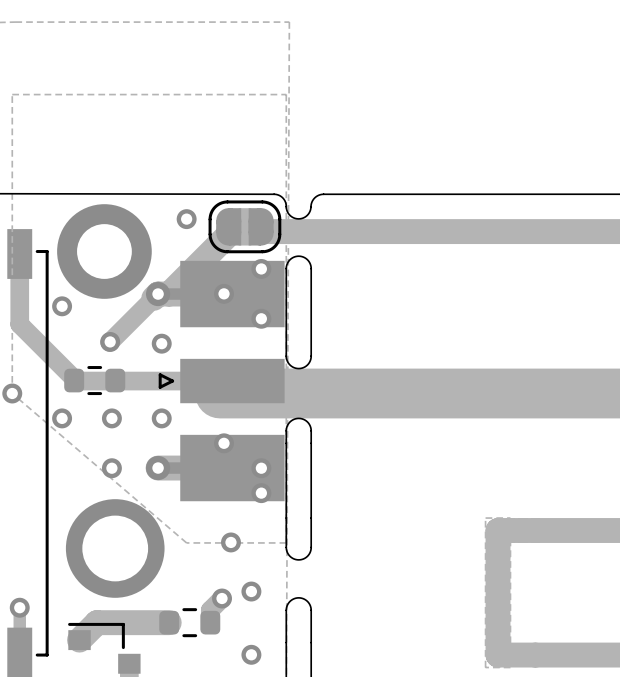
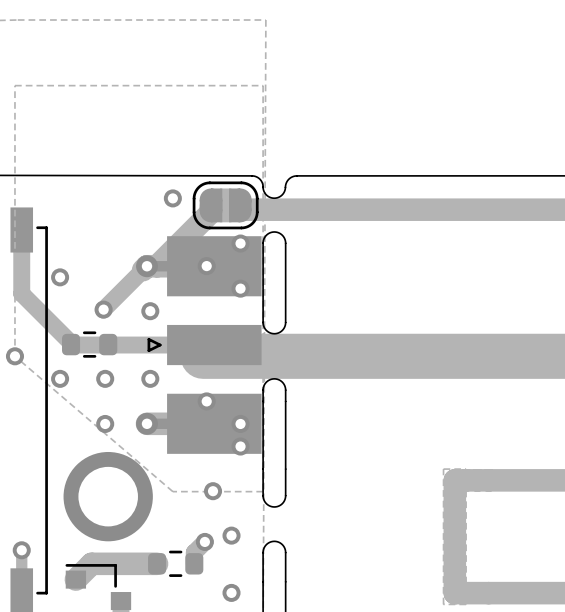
part: (104, 251) -> none

